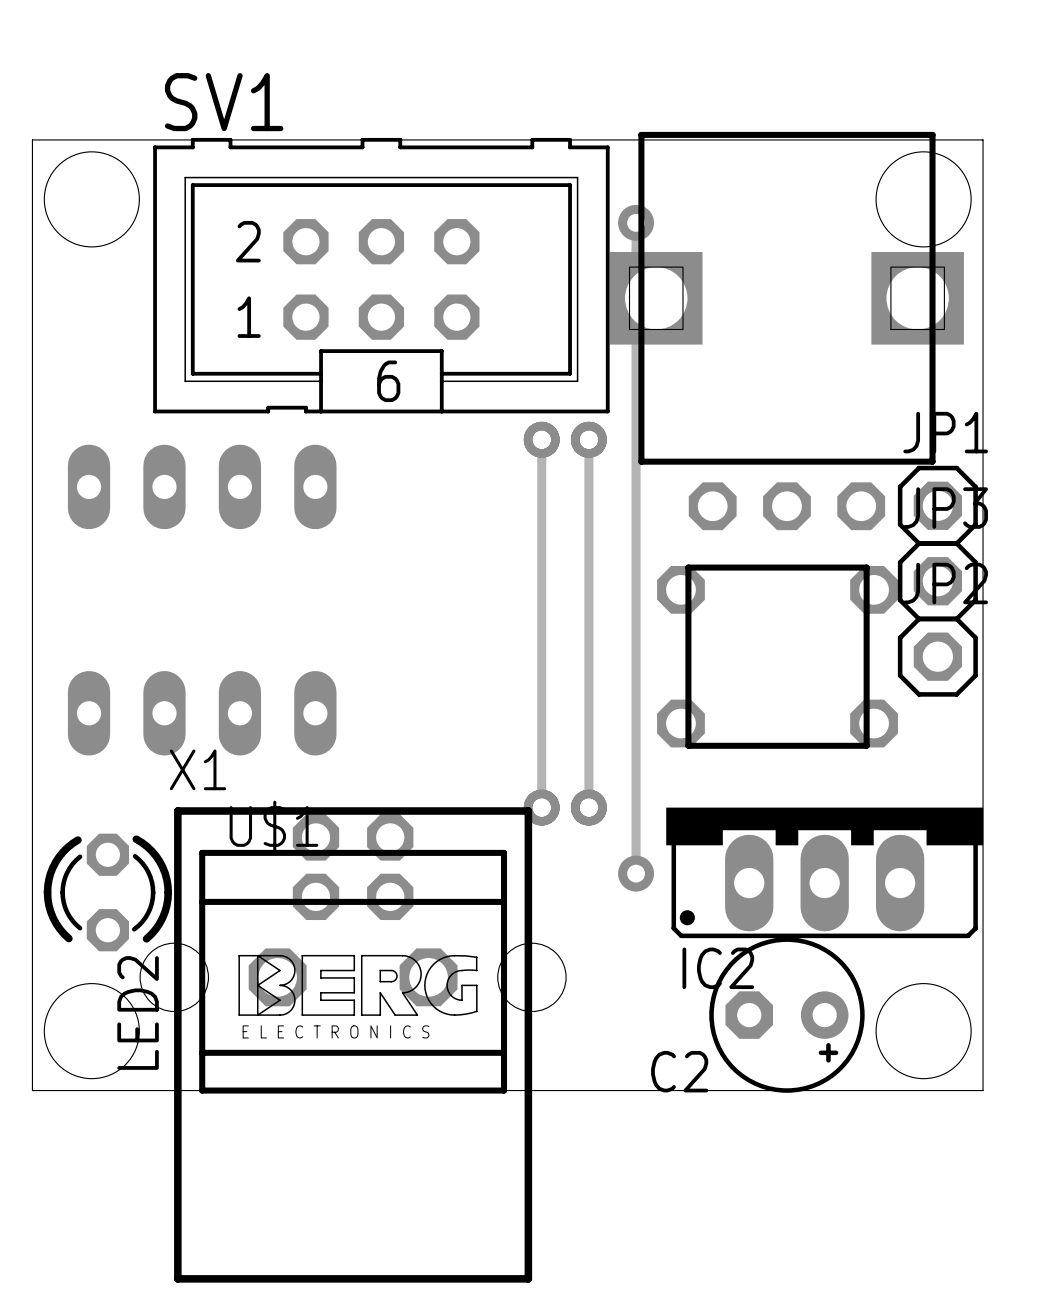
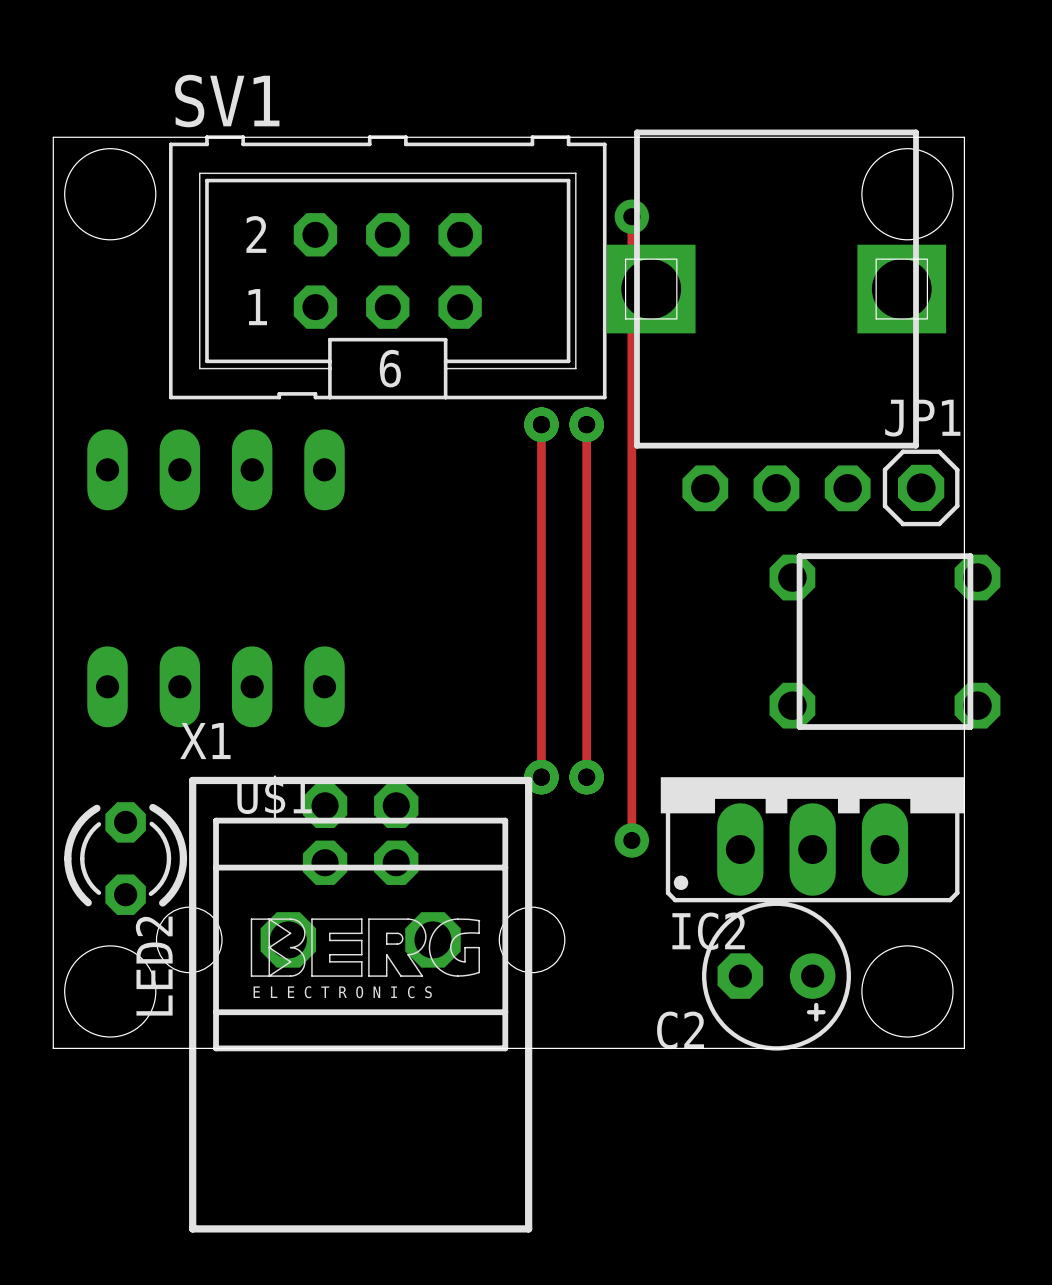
JP3: (937, 581) -> none
part position: (777, 656) -> (884, 641)
JP2: (937, 656) -> none

